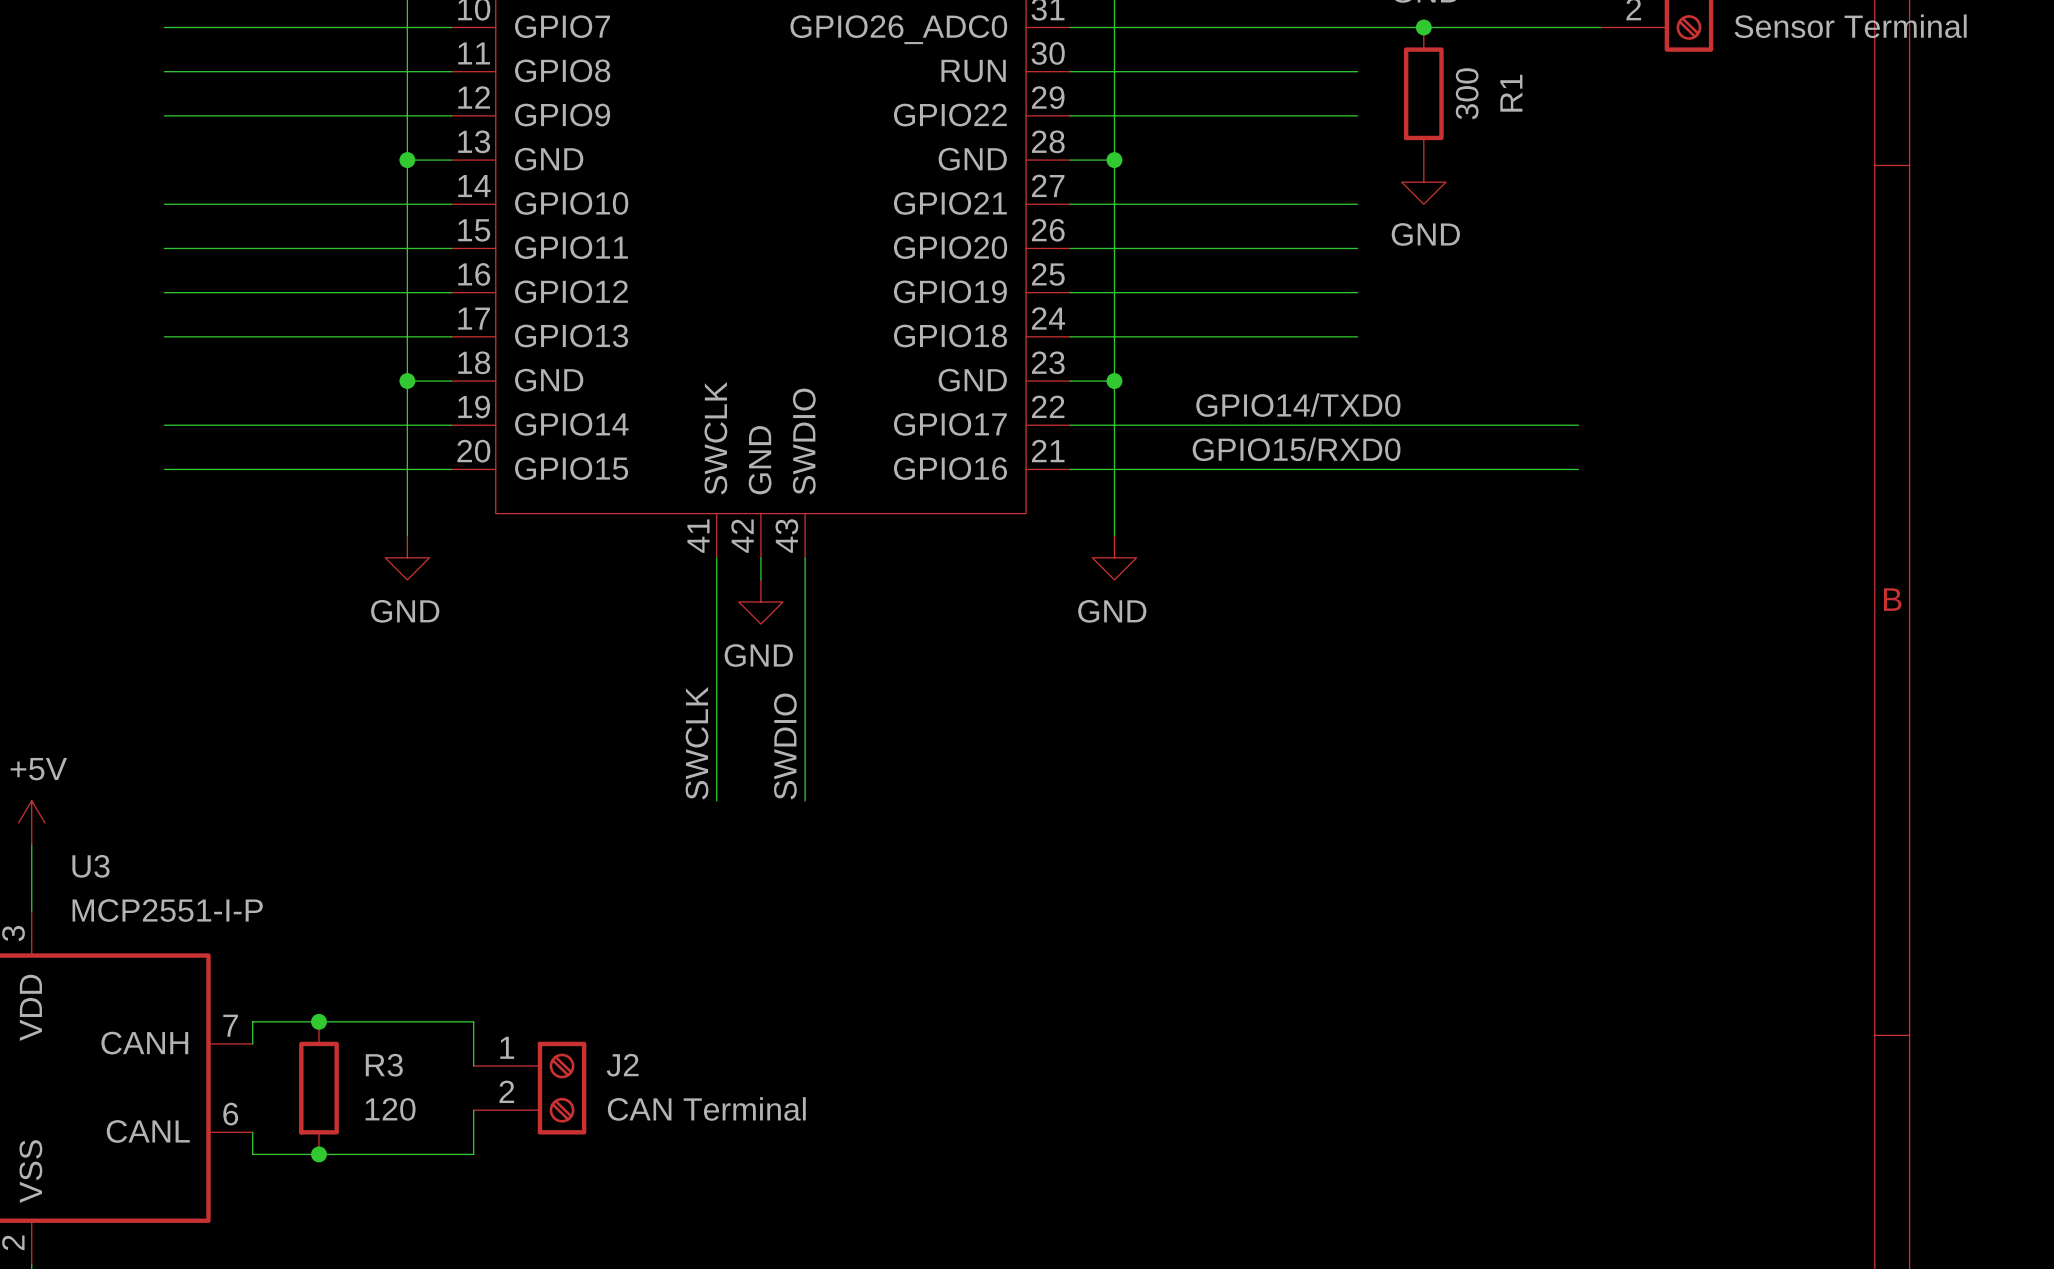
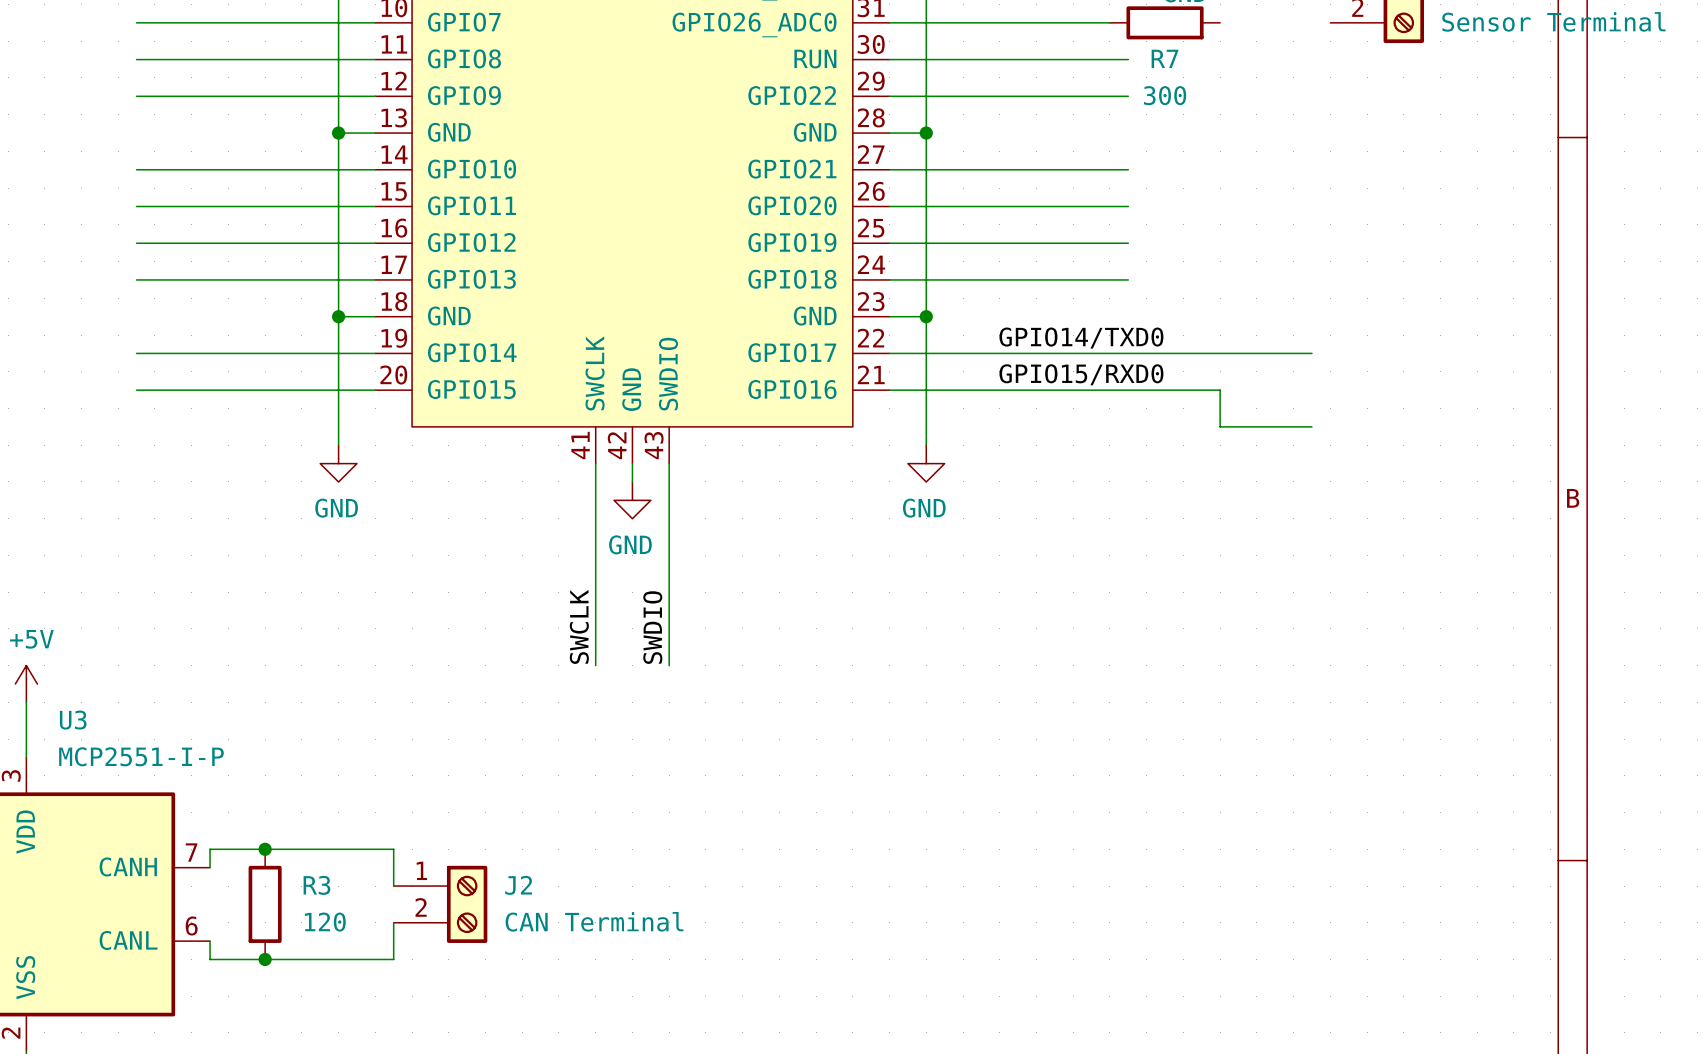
wire: (1335, 27) (1600, 27) -> none
R7: none -> 300 (1165, 22)
junction: (1423, 27) -> none
R1: 300 (1423, 93) -> none
power symbol: GND (1423, 182) -> none
wire: (1468, 469) (1578, 469) -> (1220, 390) (1220, 426) (1311, 426)

